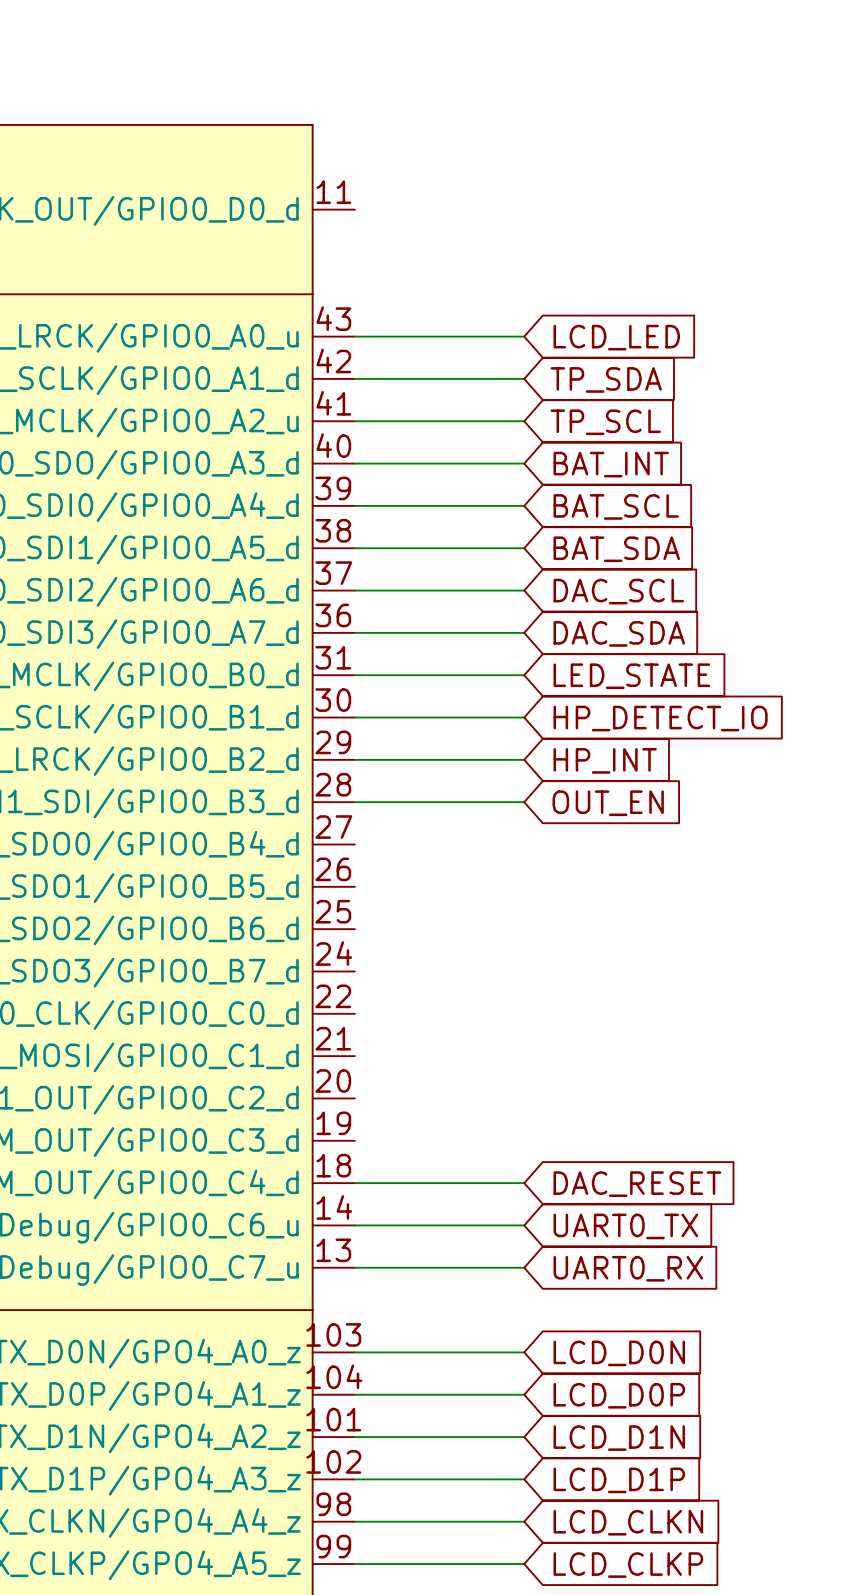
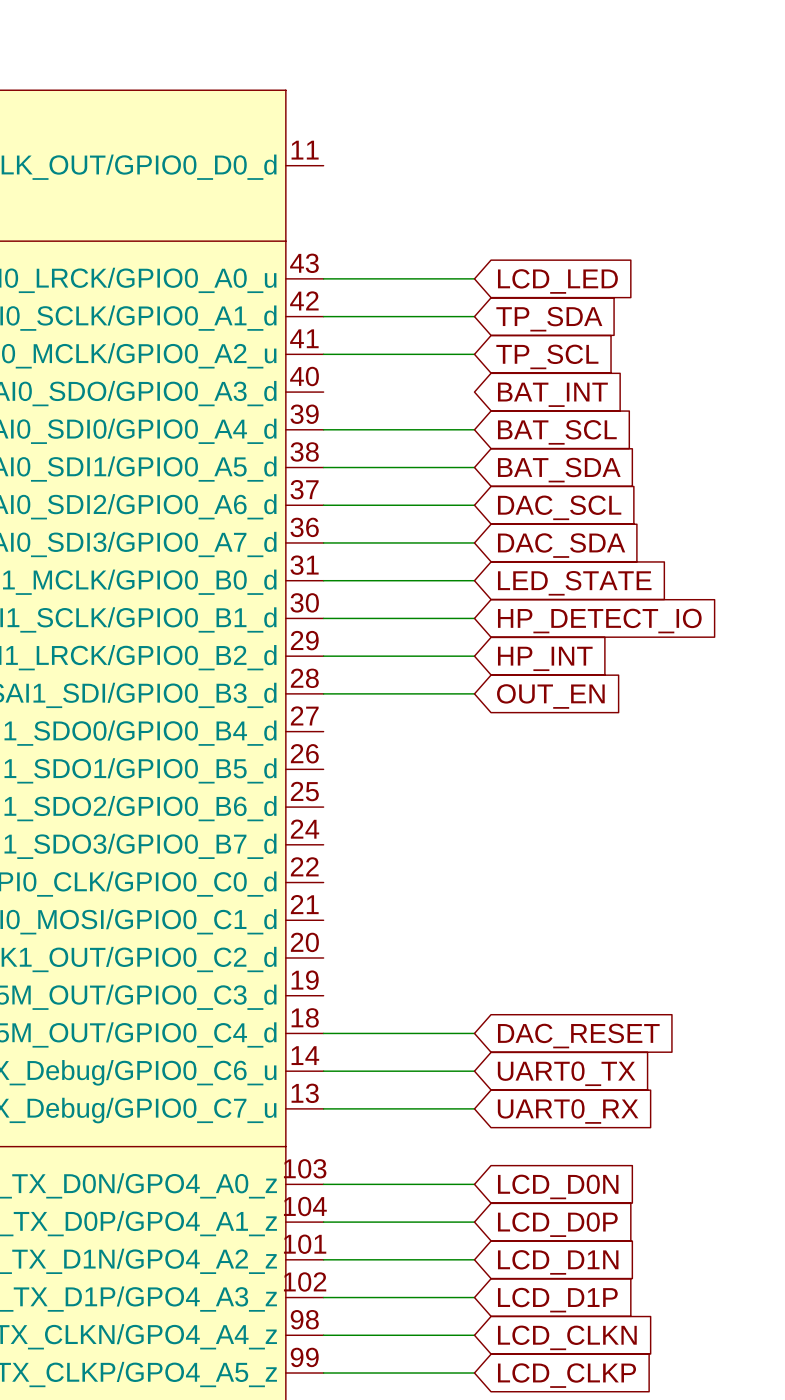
wire: (354, 463) (524, 463) -> none

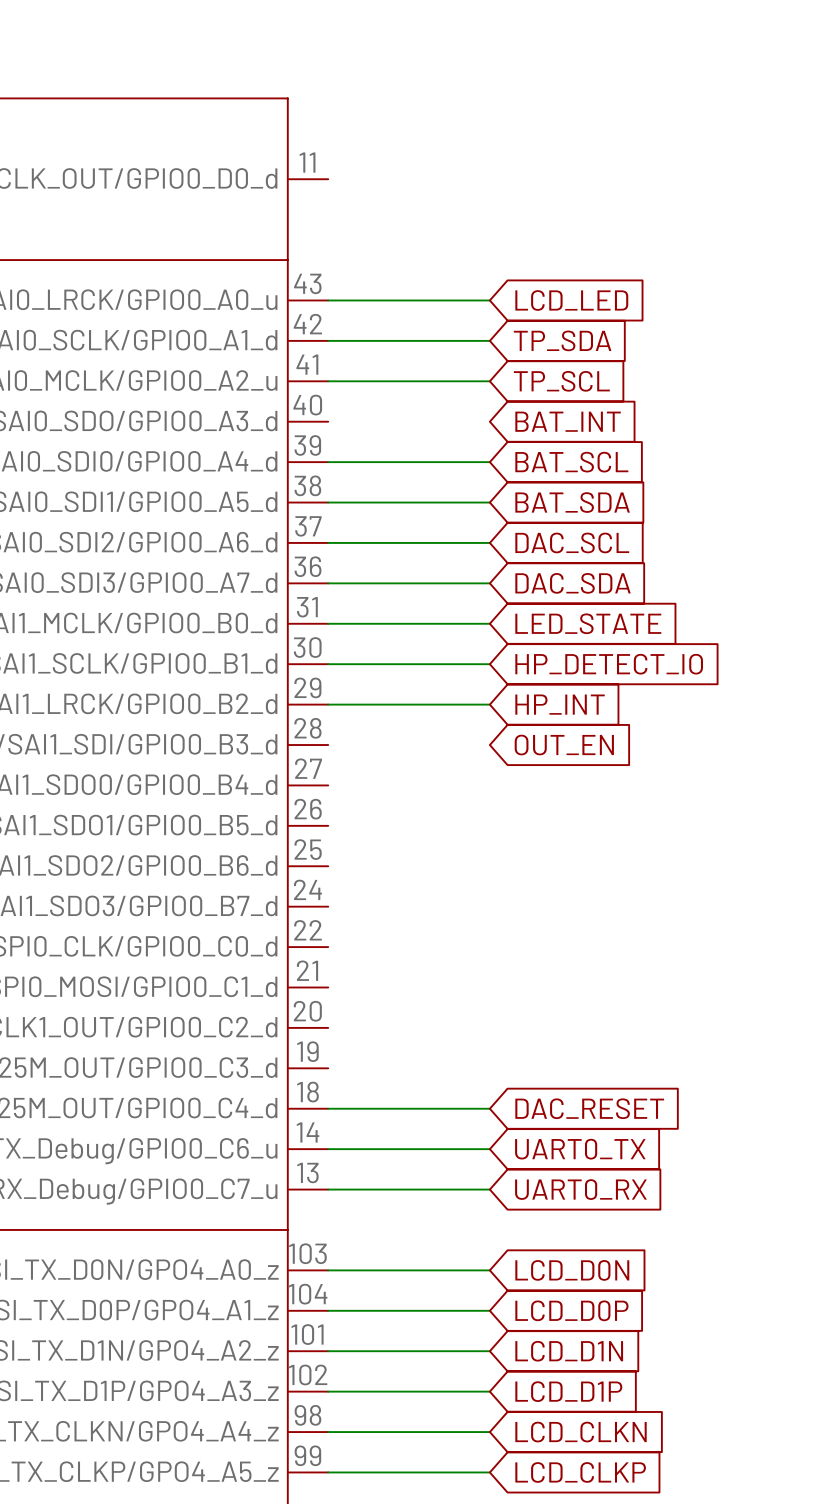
wire: (323, 693) (474, 693) -> none

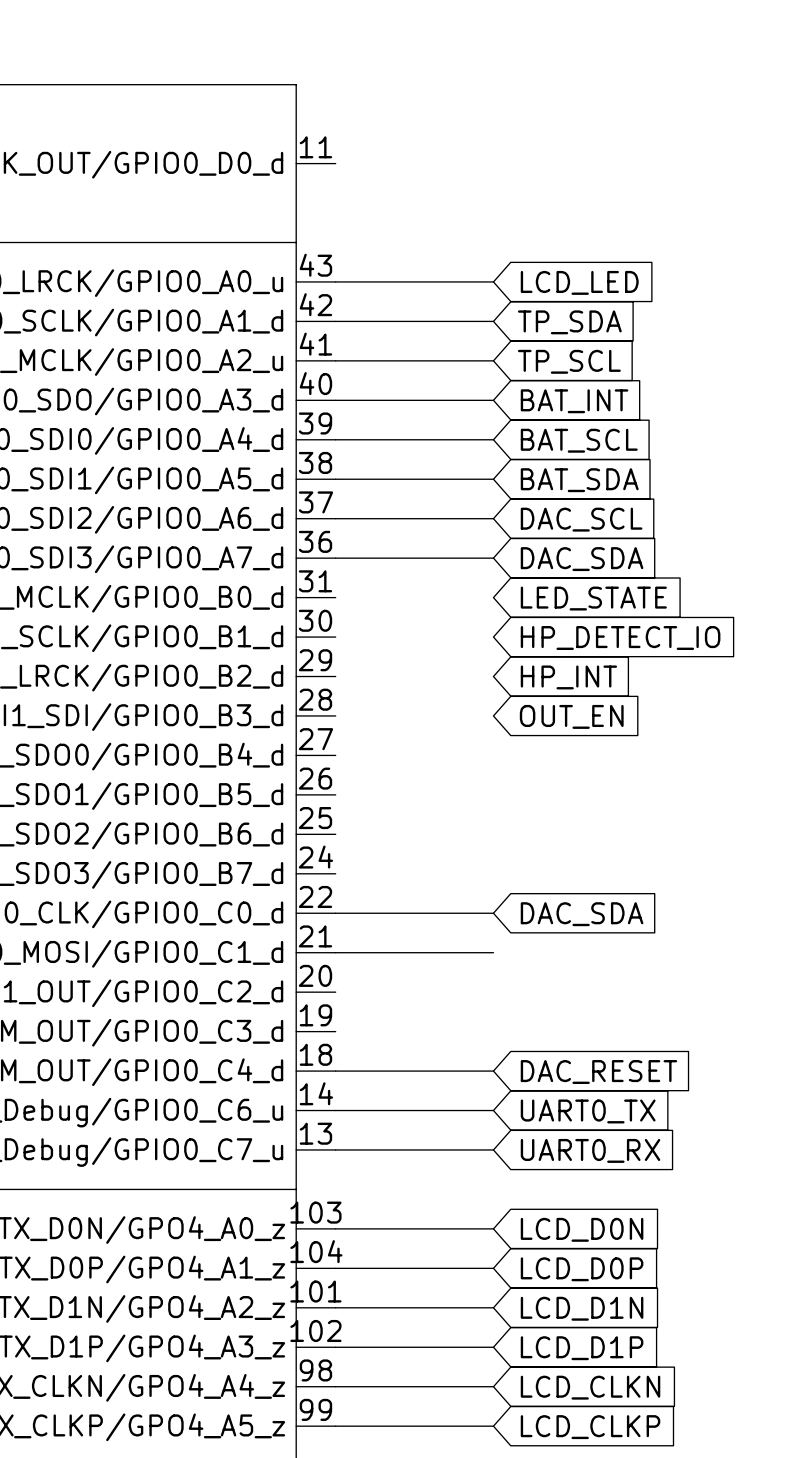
wire: (328, 623) (489, 623) -> (335, 400) (493, 400)
wire: (328, 664) (489, 664) -> (335, 913) (493, 913)
wire: (328, 704) (489, 704) -> (335, 952) (493, 952)
global label: none -> DAC_SDA (582, 914)

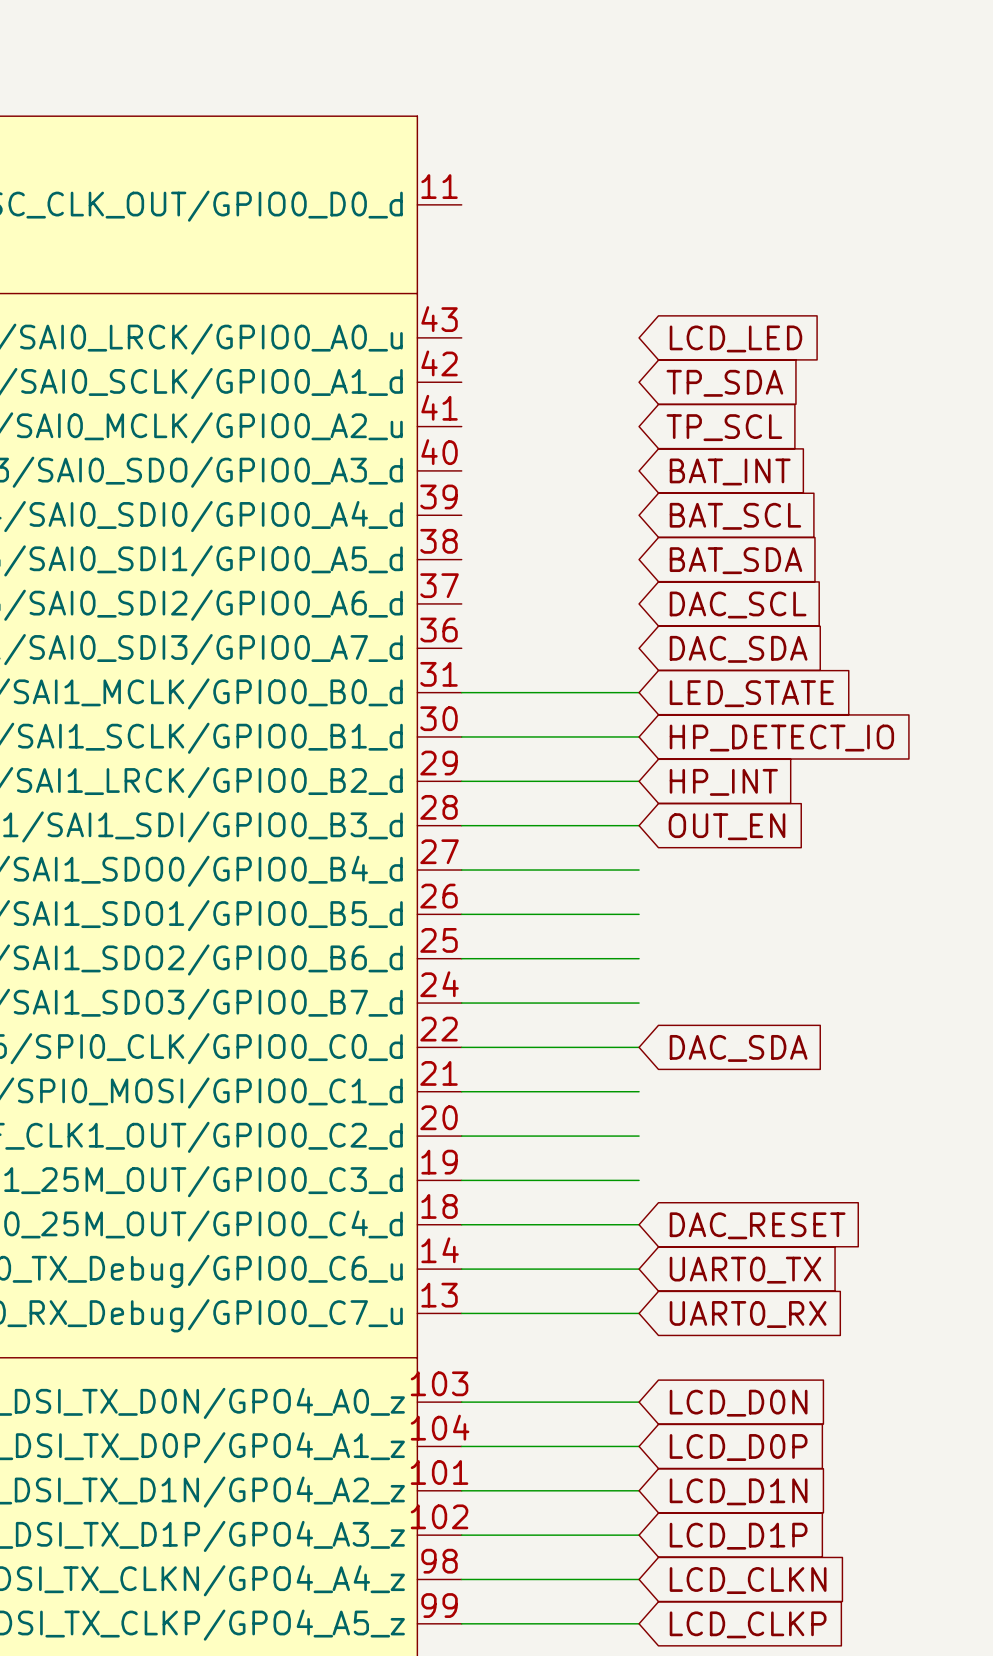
wire: (335, 281) (493, 281) -> (461, 692) (639, 692)
wire: (335, 321) (493, 321) -> (461, 736) (639, 736)
wire: (335, 360) (493, 360) -> (461, 781) (639, 781)
wire: (335, 400) (493, 400) -> (461, 825) (639, 825)
wire: (335, 439) (493, 439) -> (461, 870) (639, 870)
wire: (335, 479) (493, 479) -> (461, 914) (639, 914)
wire: (335, 518) (493, 518) -> (461, 958) (639, 958)
wire: (335, 558) (493, 558) -> (461, 1003) (639, 1003)
wire: none -> (461, 1136) (639, 1136)
wire: none -> (461, 1180) (639, 1180)

